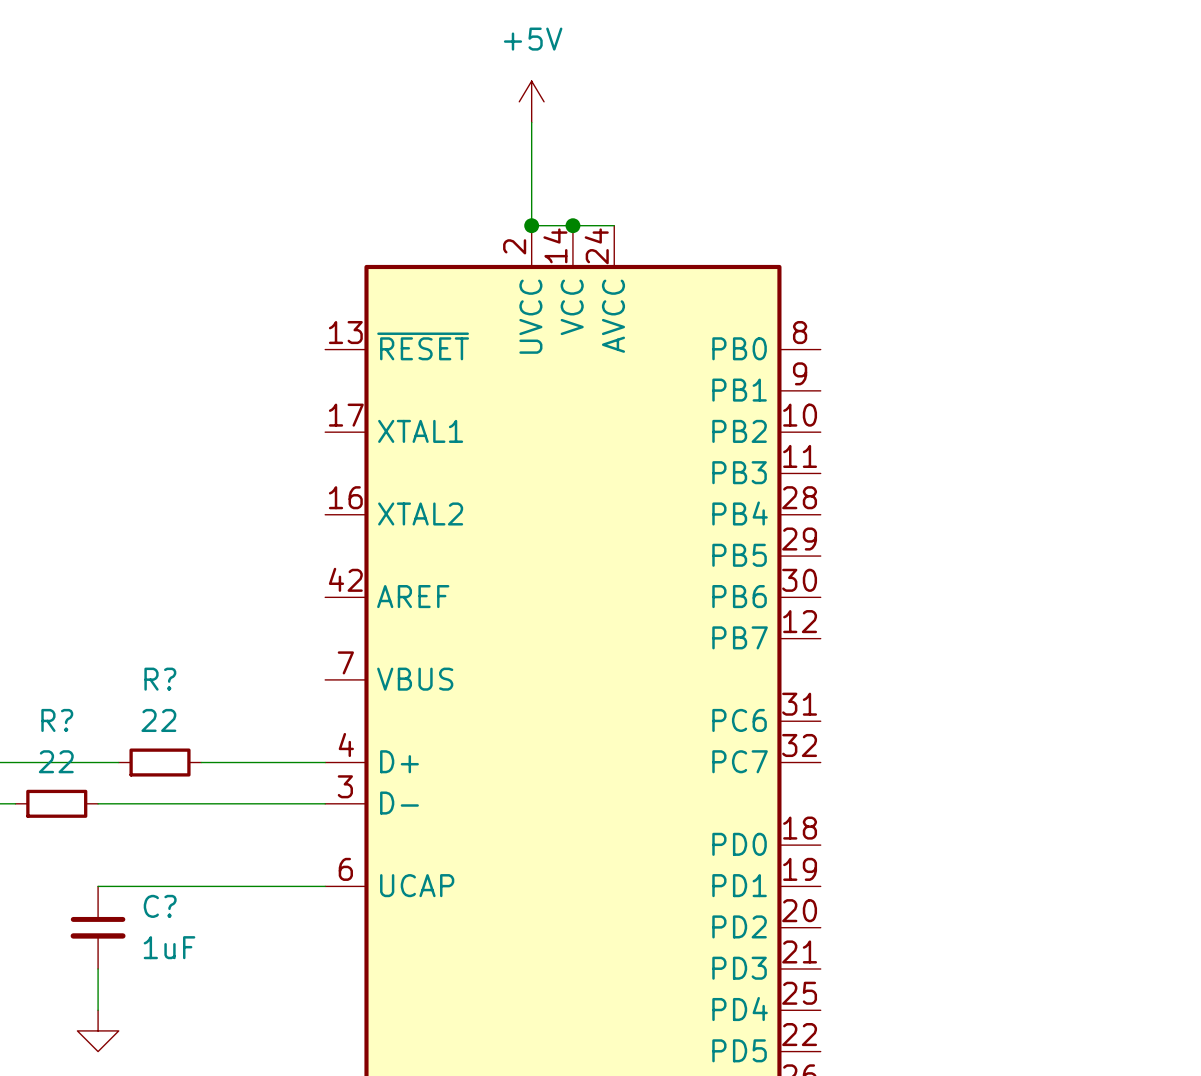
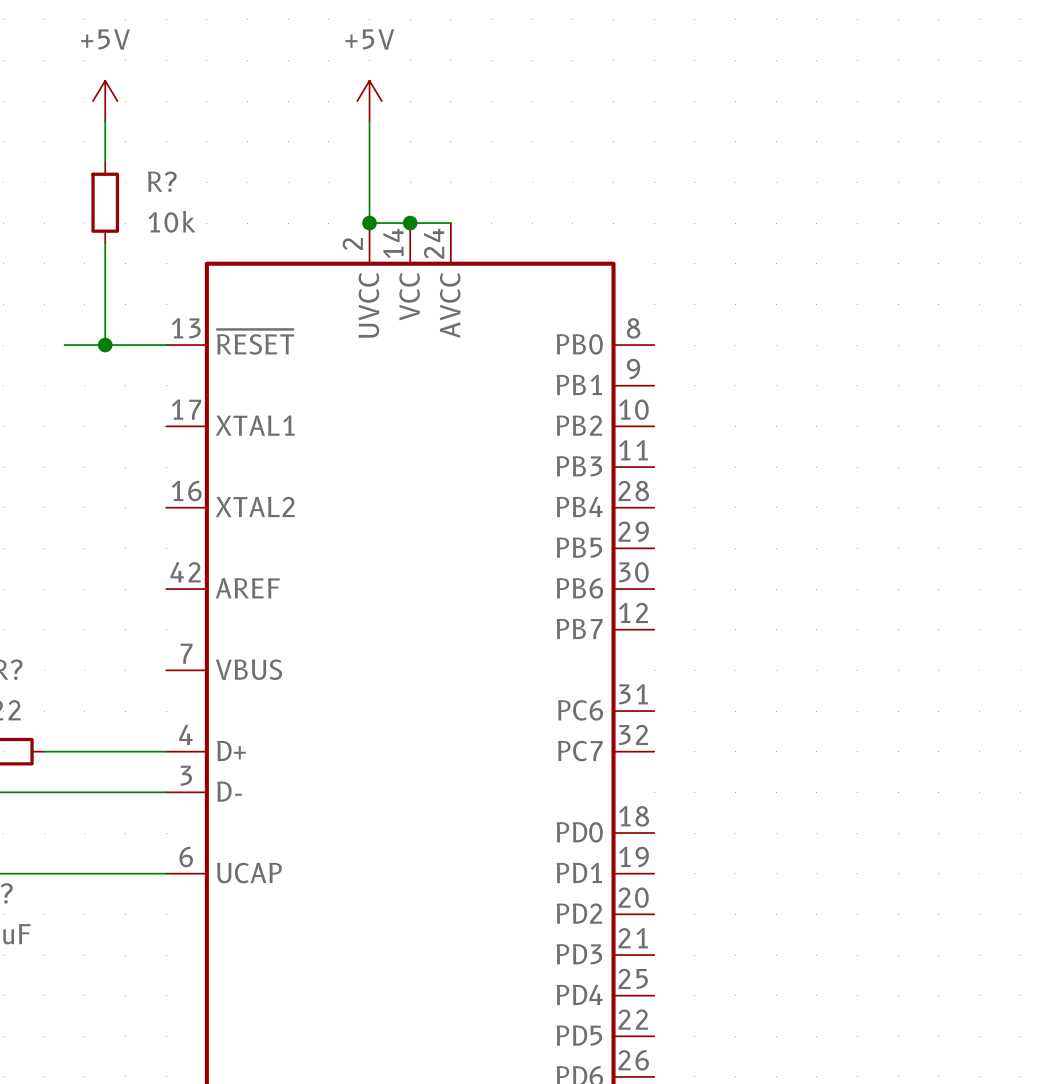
power symbol: none -> +5V (105, 101)
wire: none -> (105, 121) (105, 162)
R?: none -> 10k (105, 202)
wire: none -> (105, 243) (105, 345)
wire: none -> (64, 345) (166, 345)
junction: none -> (105, 345)

